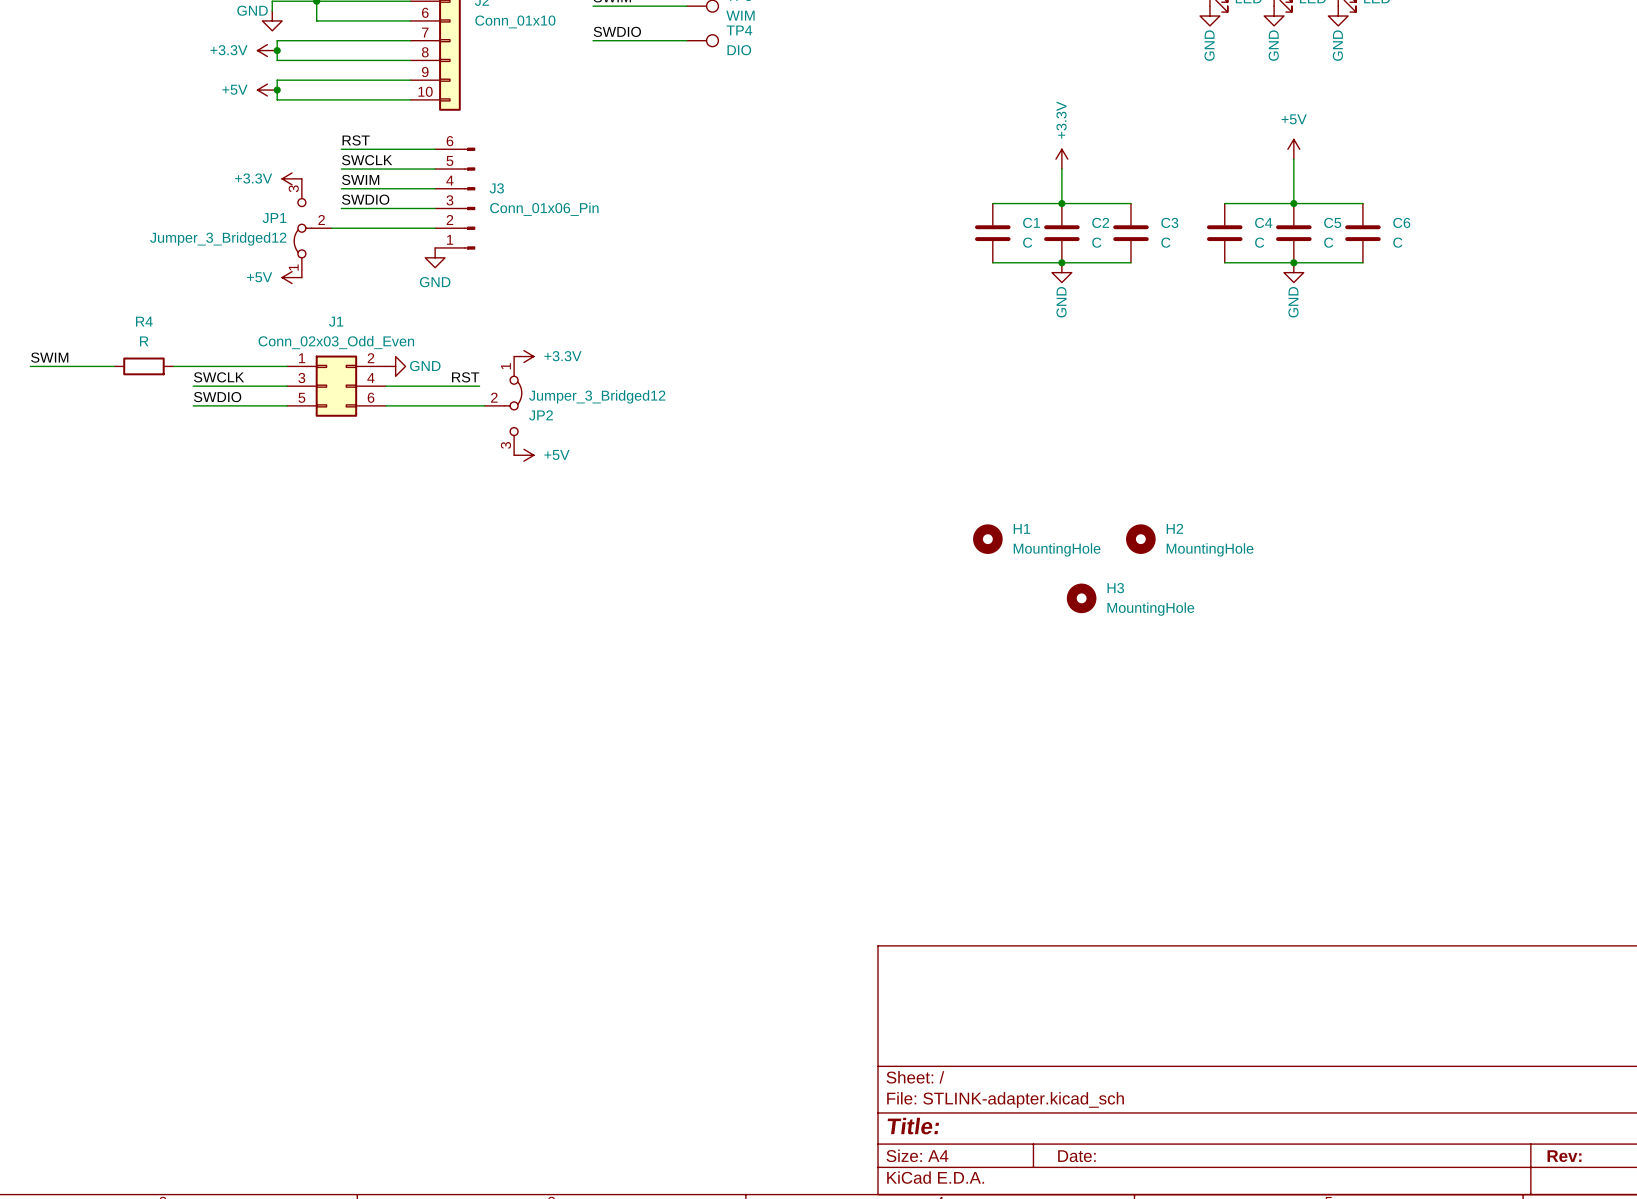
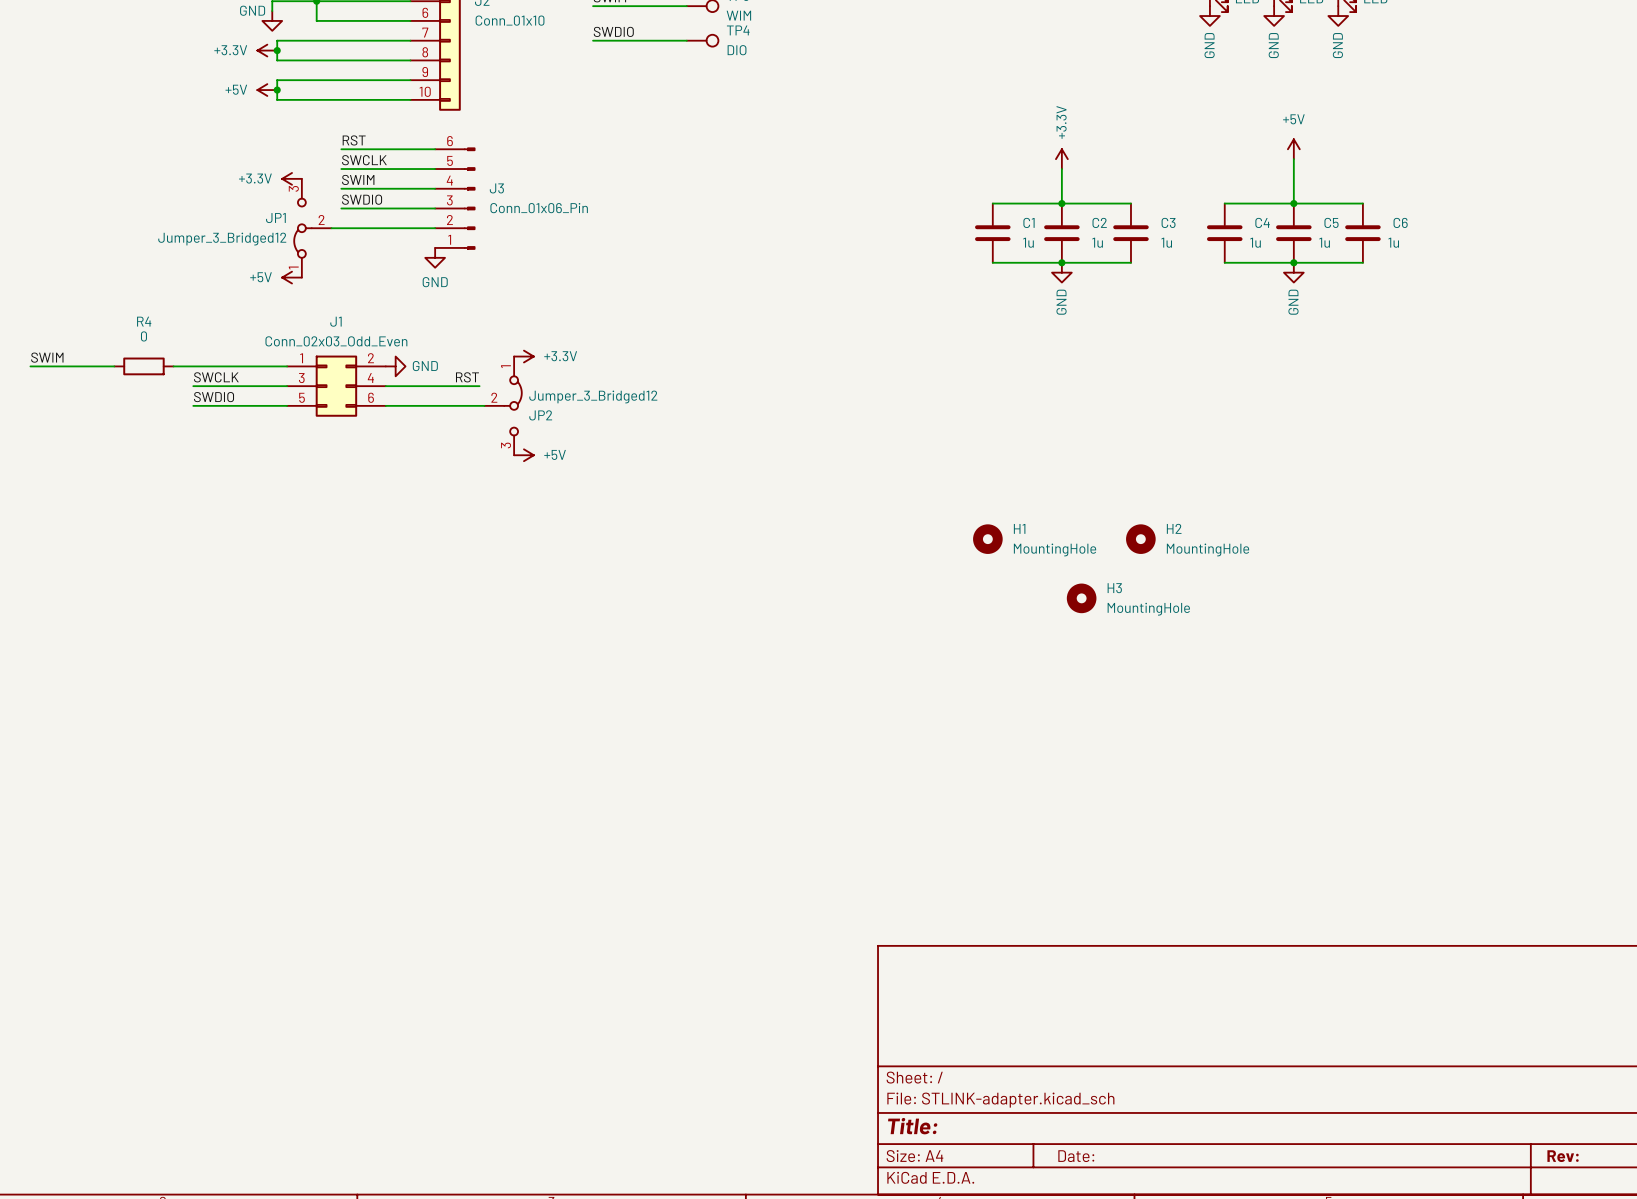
C1 value: C (1027, 242) -> 1u (1028, 242)
C2 value: C (1096, 242) -> 1u (1097, 242)
C3 value: C (1165, 242) -> 1u (1166, 242)
C4 value: C (1259, 242) -> 1u (1255, 242)
C5 value: C (1328, 242) -> 1u (1324, 242)
C6 value: C (1397, 242) -> 1u (1393, 242)
R4 value: R (144, 341) -> 0 (143, 336)

